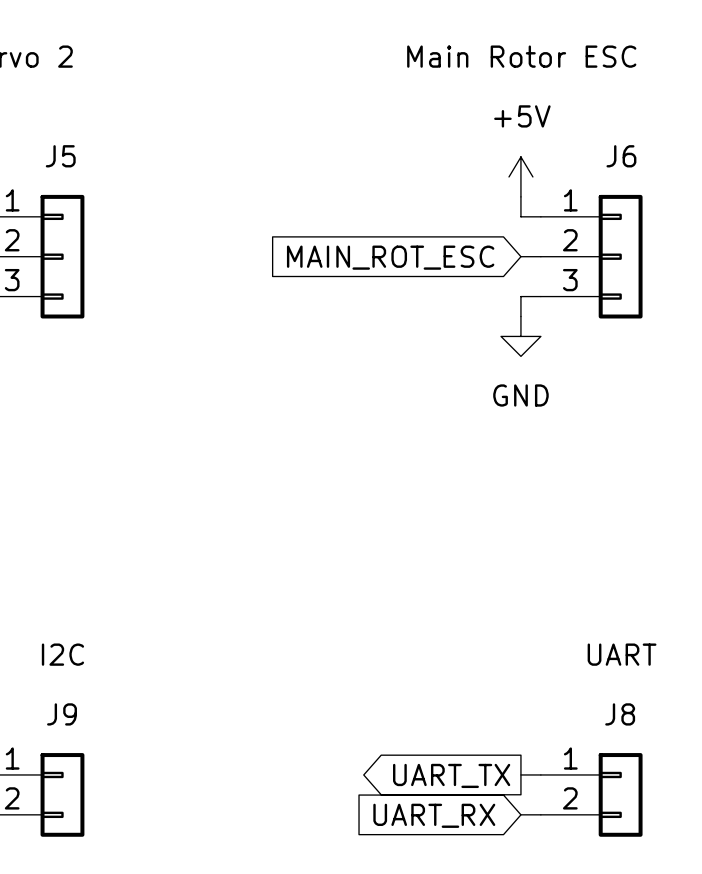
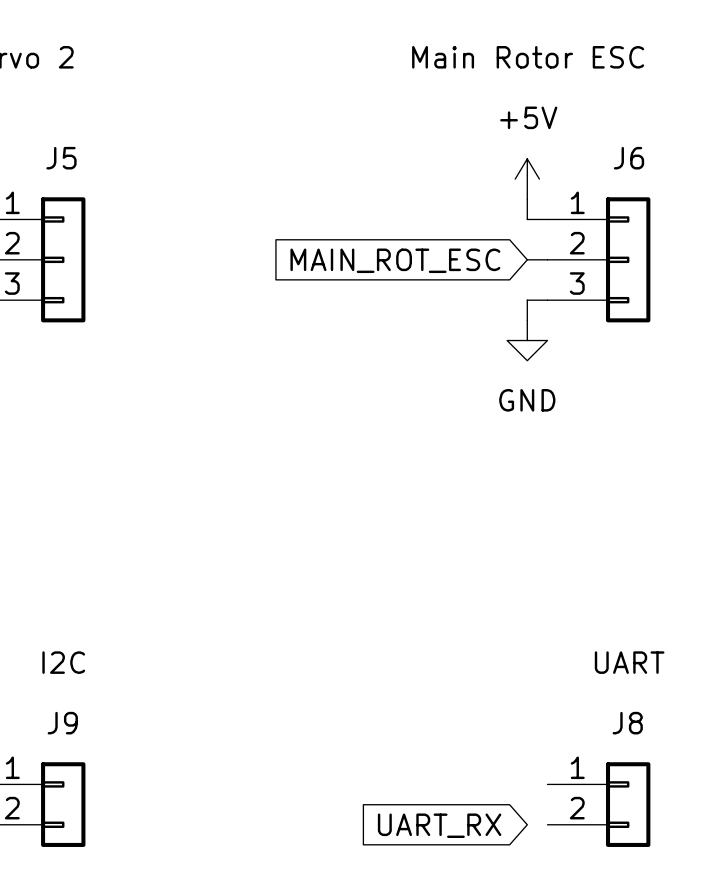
wire: (520, 774) (540, 774) -> none
global label: UART_TX (451, 775) -> none
wire: (520, 814) (540, 814) -> none

